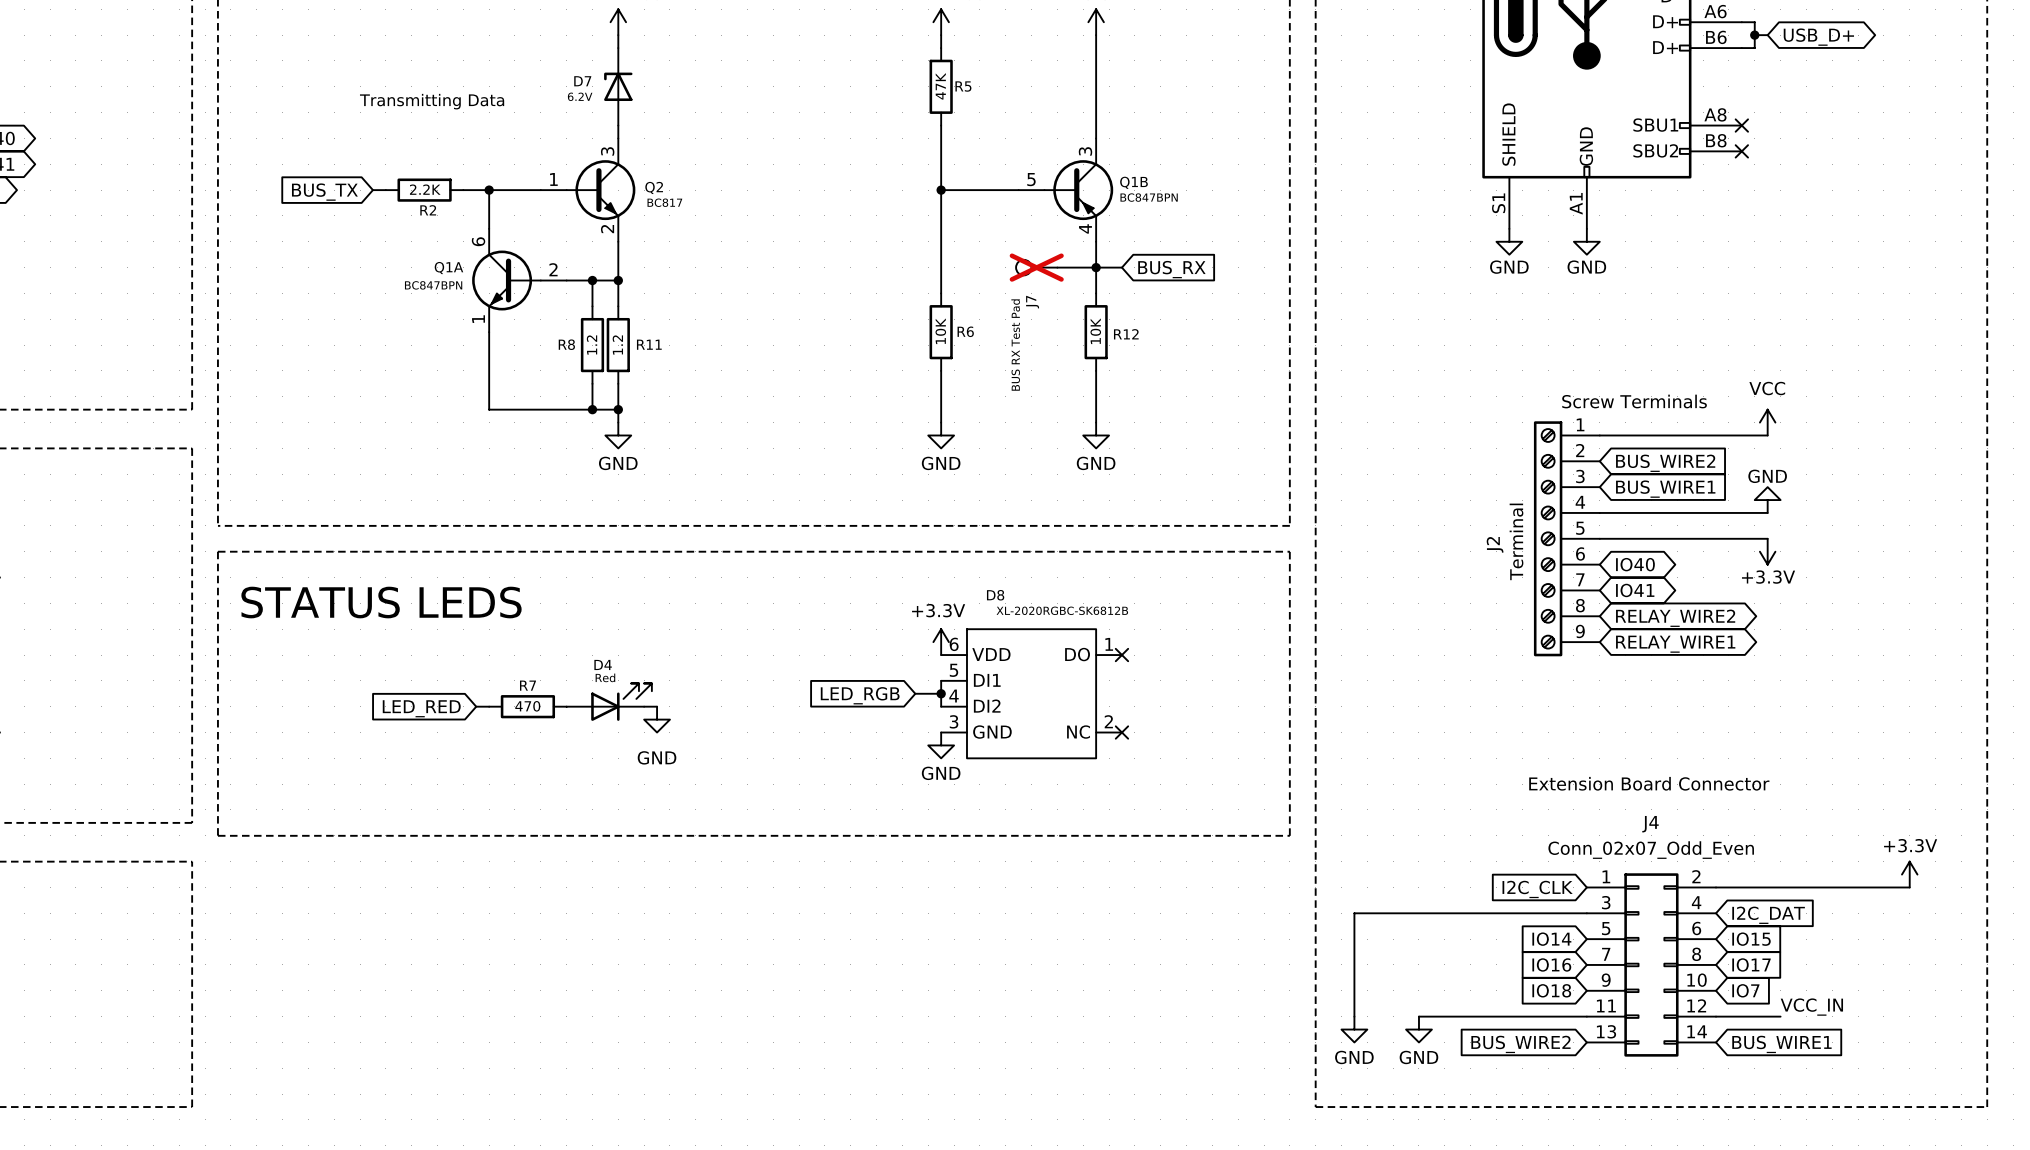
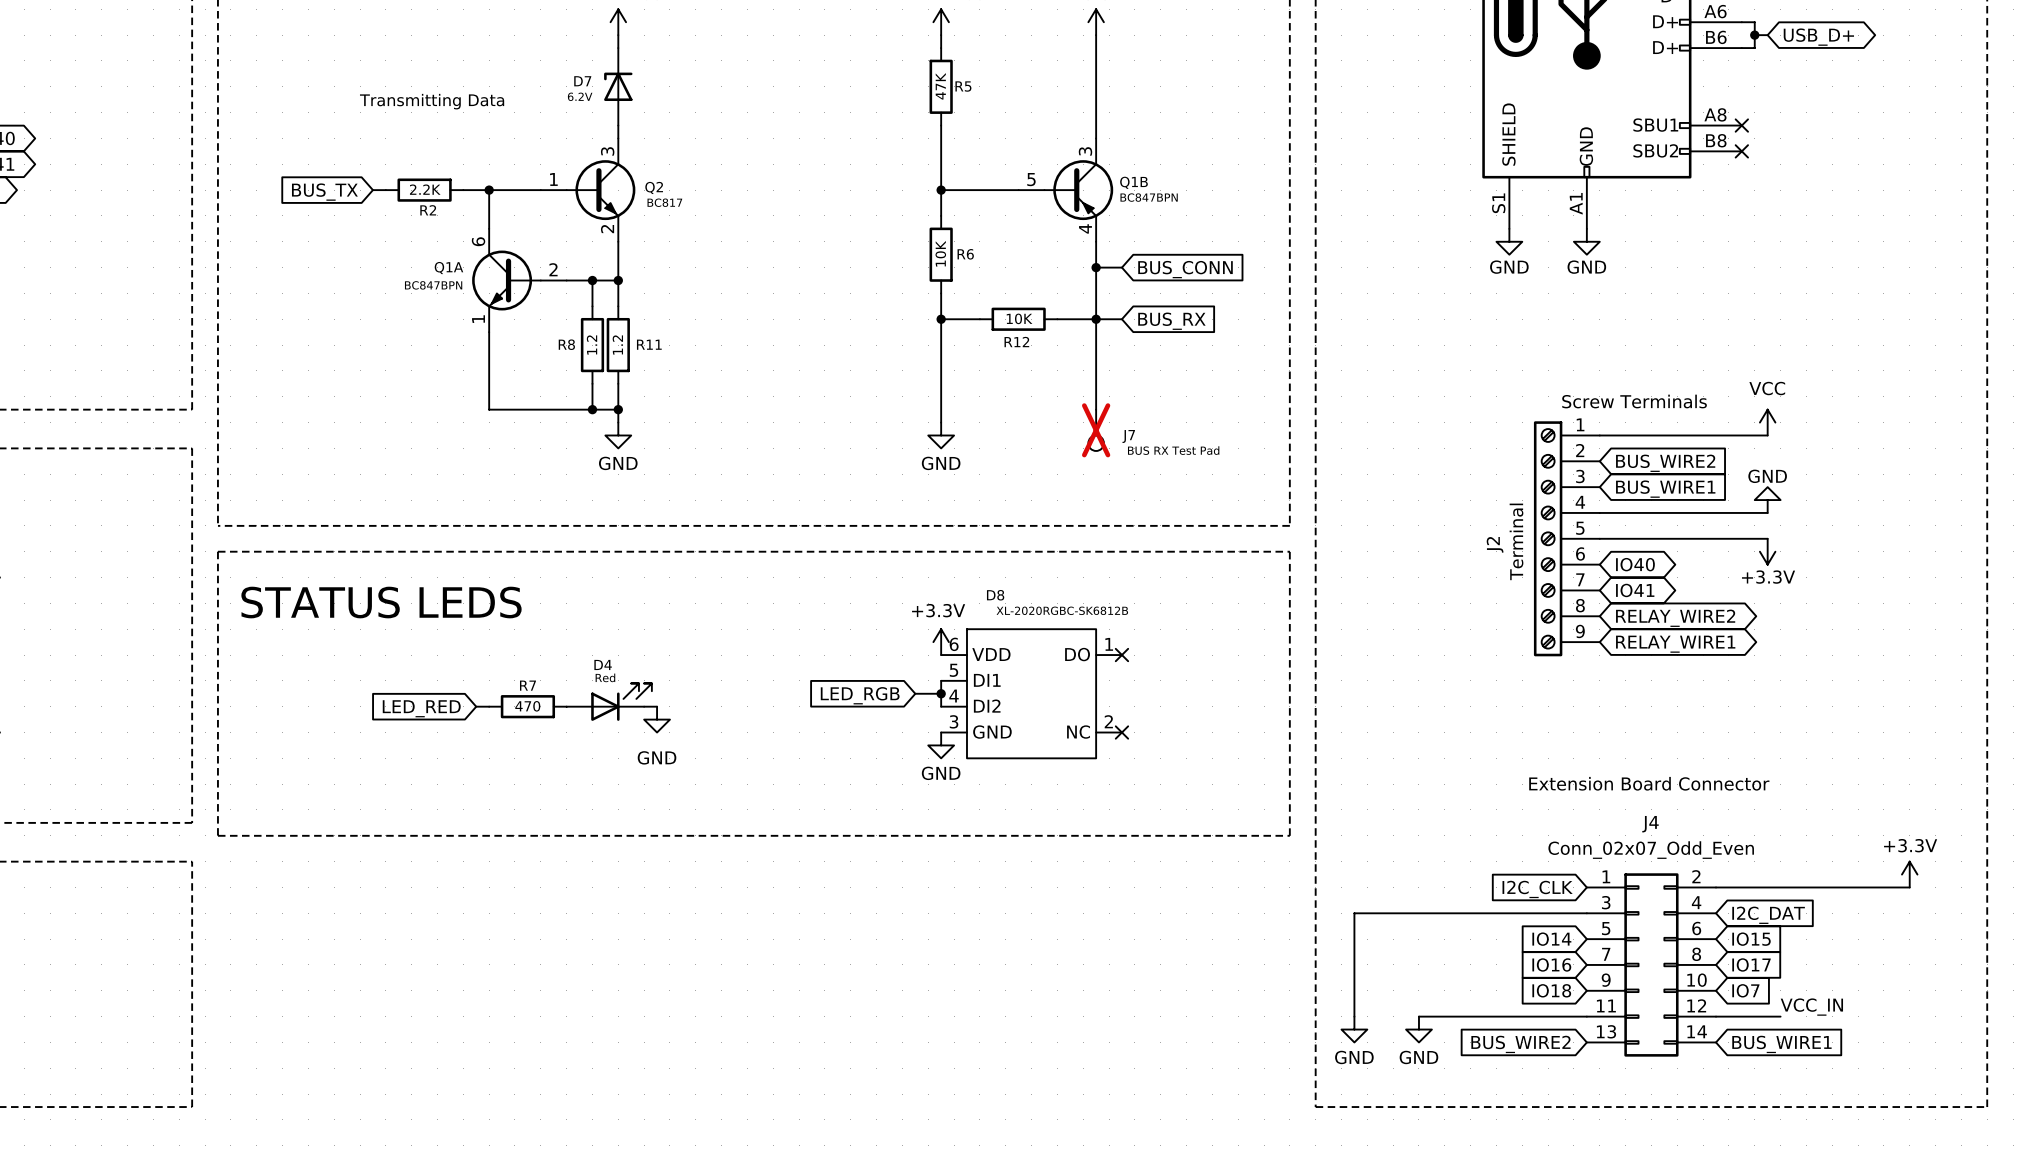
wire: (941, 215) (941, 293) -> (941, 370) (941, 293)
J7 rotation: 0° (1023, 267) -> 90° counterclockwise (1096, 443)
J7 position: (1036, 267) -> (1096, 430)
wire: (1057, 267) (1096, 267) -> (941, 319) (979, 319)
global label: BUS_RX (1171, 269) -> BUS_CONN (1185, 269)
wire: none -> (1096, 293) (1096, 370)
junction: none -> (941, 319)
wire: none -> (1057, 319) (1121, 319)
junction: none -> (1096, 319)
global label: none -> BUS_RX (1171, 321)
R6 position: (941, 332) -> (941, 254)
R12 rotation: 0° (1096, 332) -> 90° clockwise (1018, 319)
R12 position: (1096, 332) -> (1018, 319)
power symbol: GND (1096, 435) -> none

